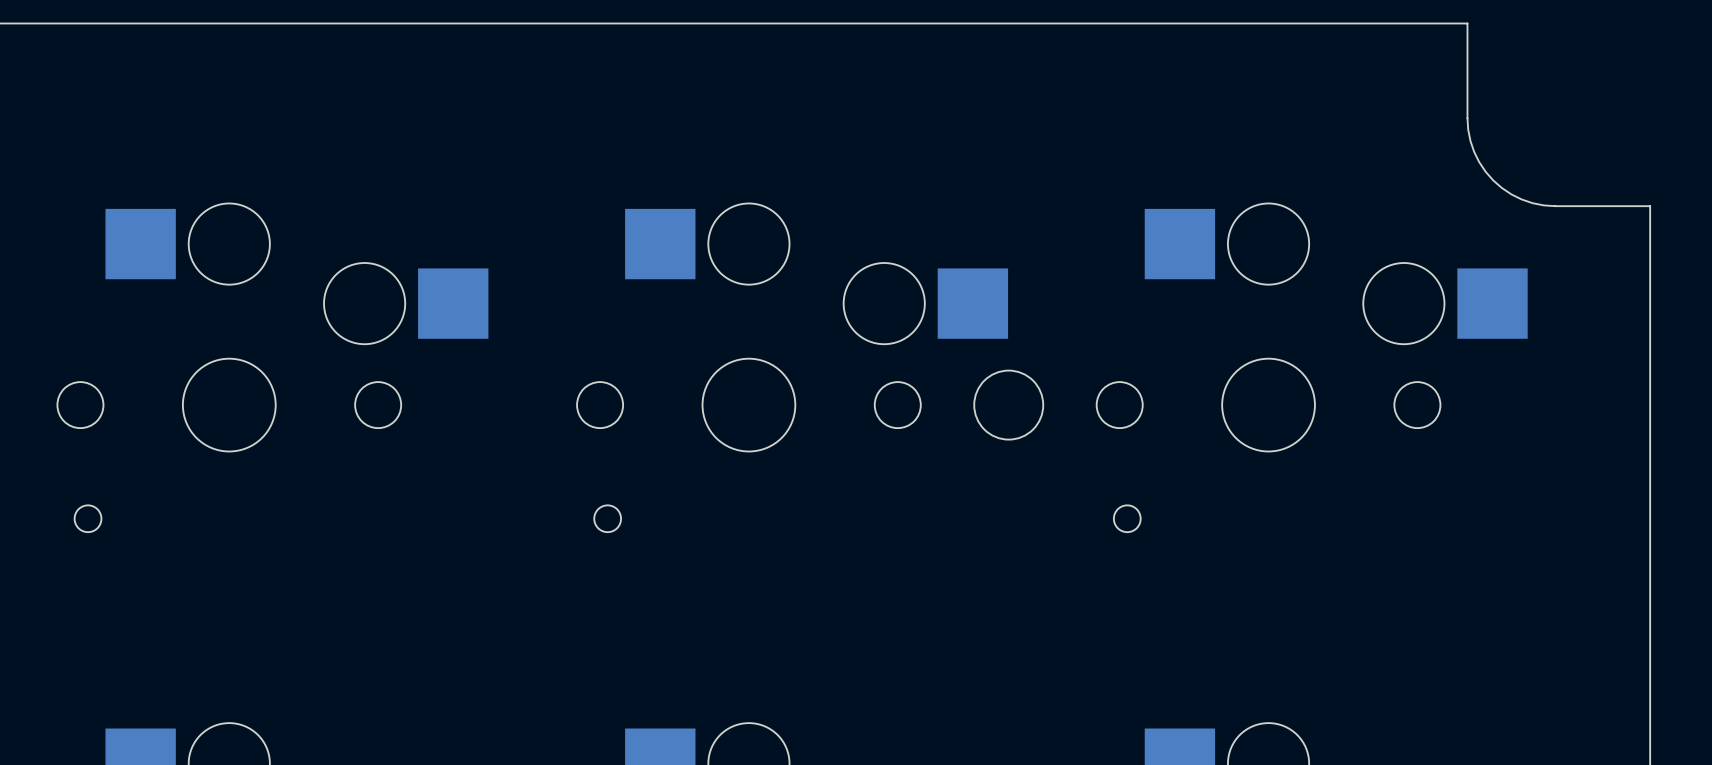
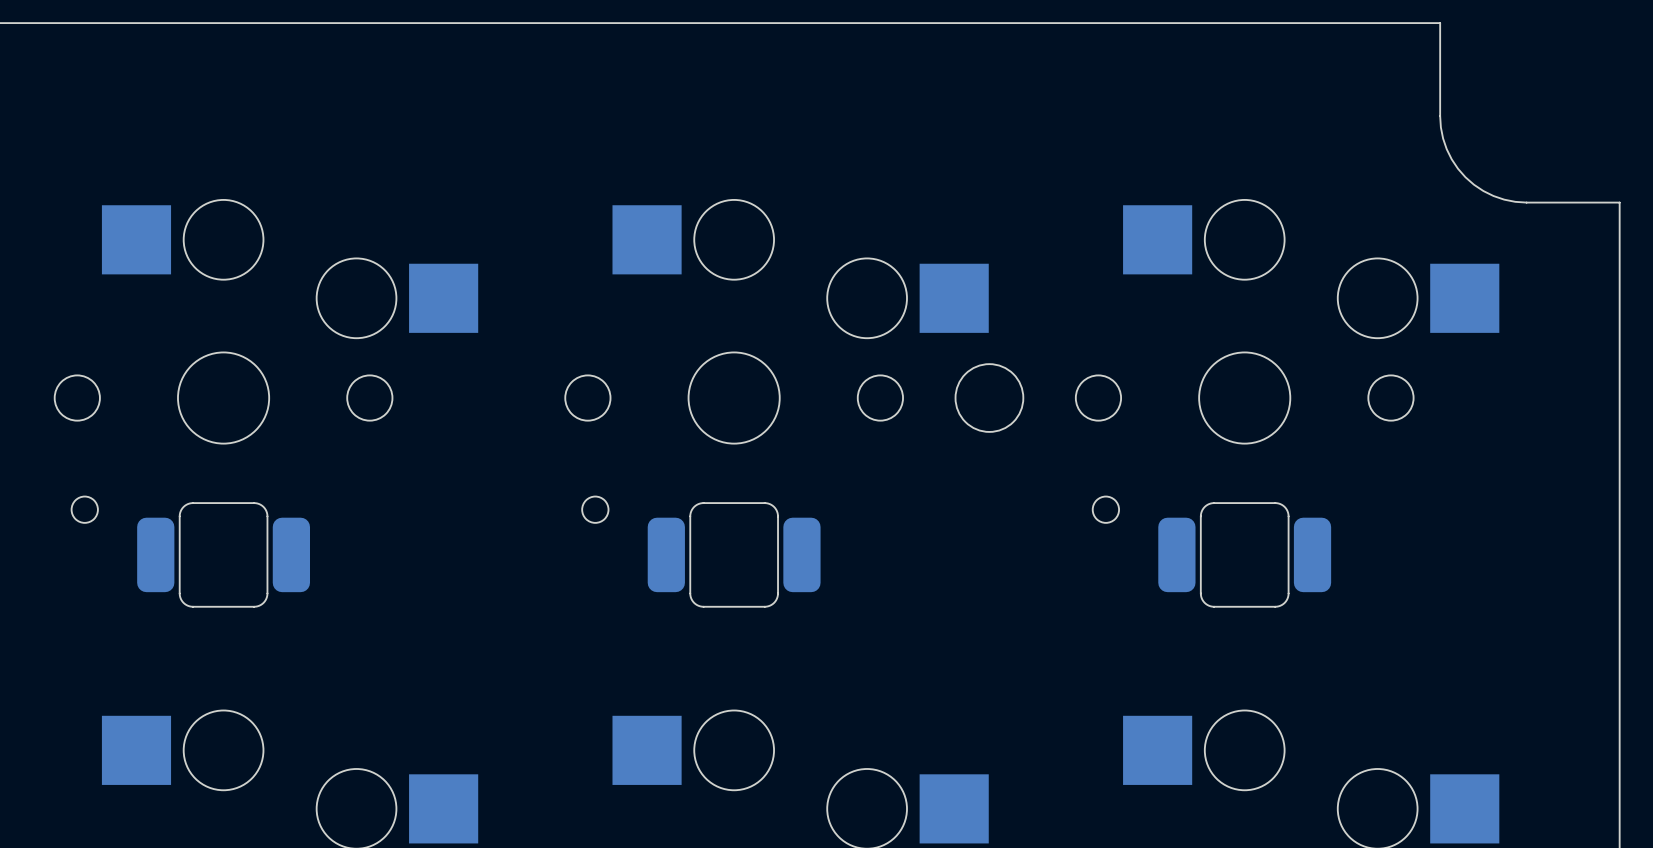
part: none -> (223, 554)
part: none -> (734, 554)
part: none -> (1244, 554)

